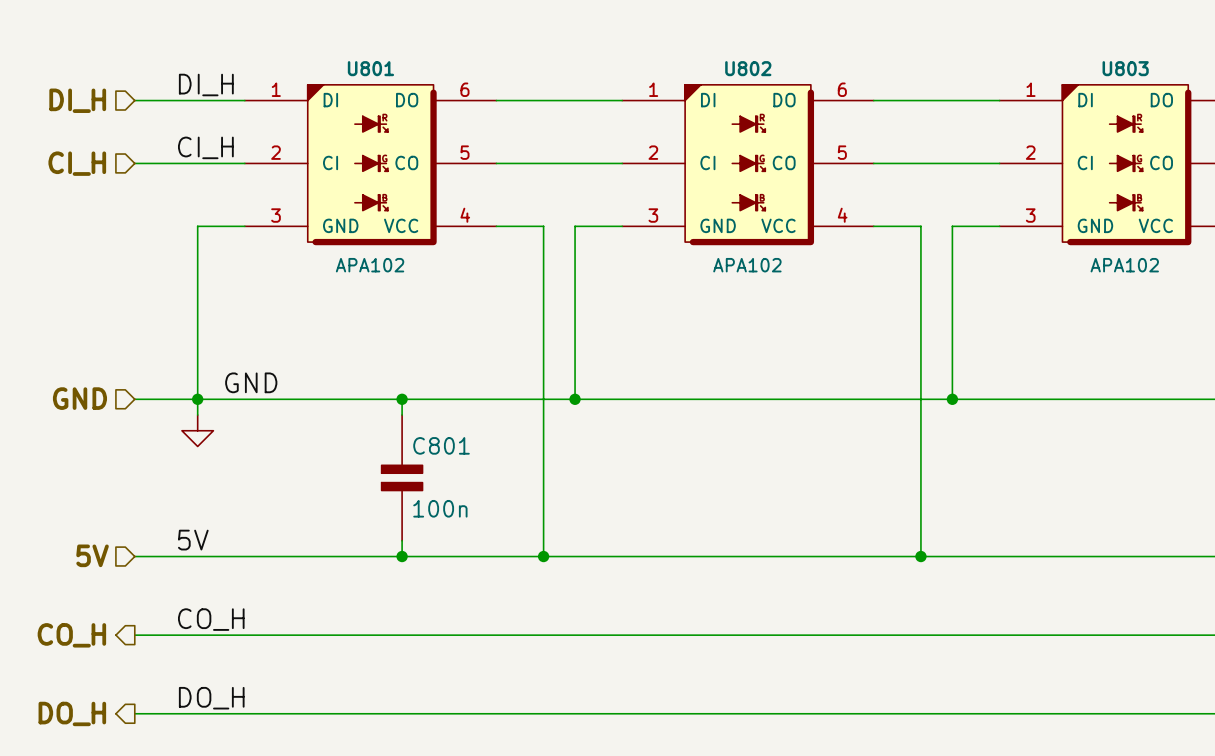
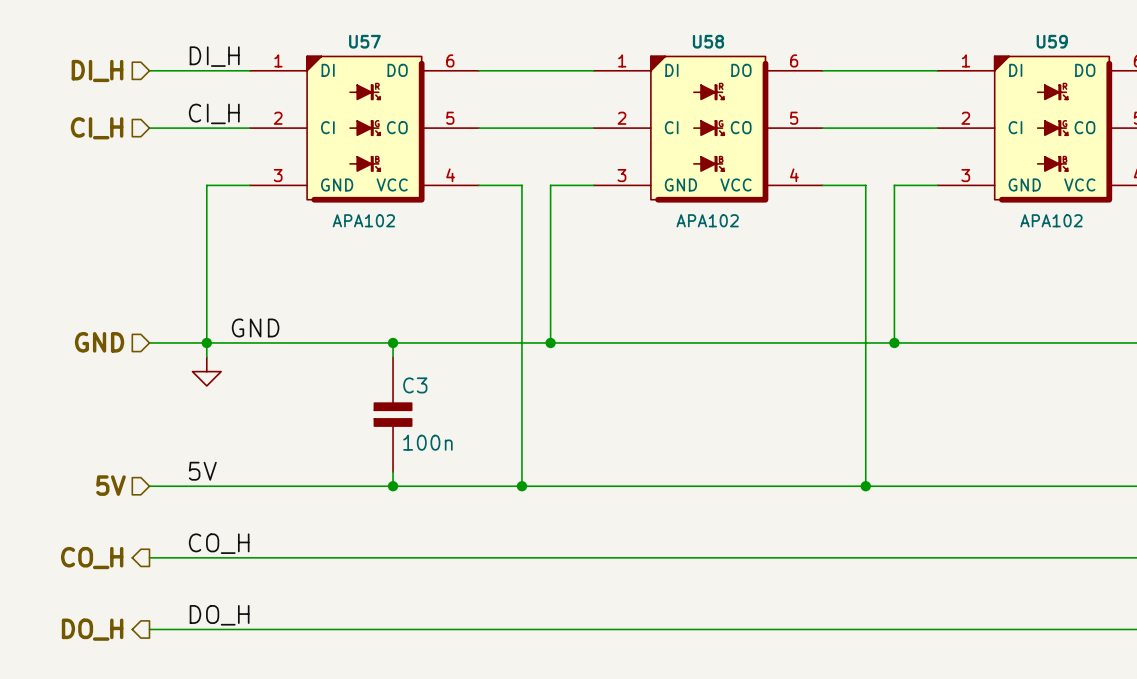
U801 name: U801 (370, 68) -> U57 (364, 41)
U802 name: U802 (748, 68) -> U58 (708, 41)
U803 name: U803 (1125, 68) -> U59 (1052, 41)
C801 name: C801 (441, 445) -> C3 (415, 385)

